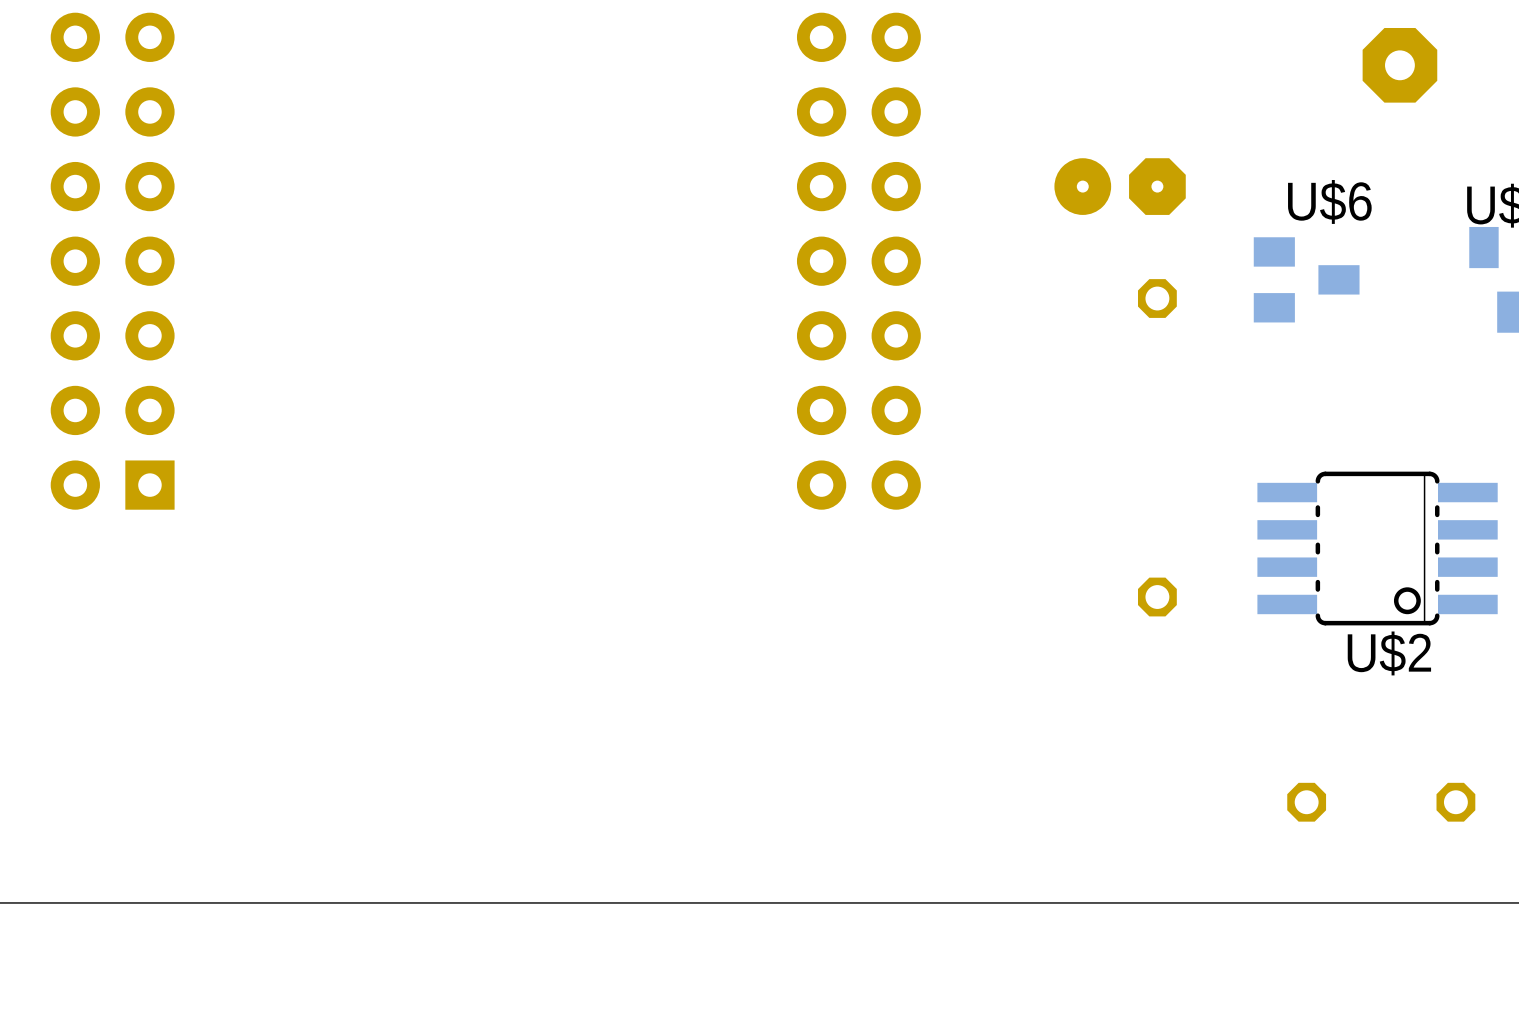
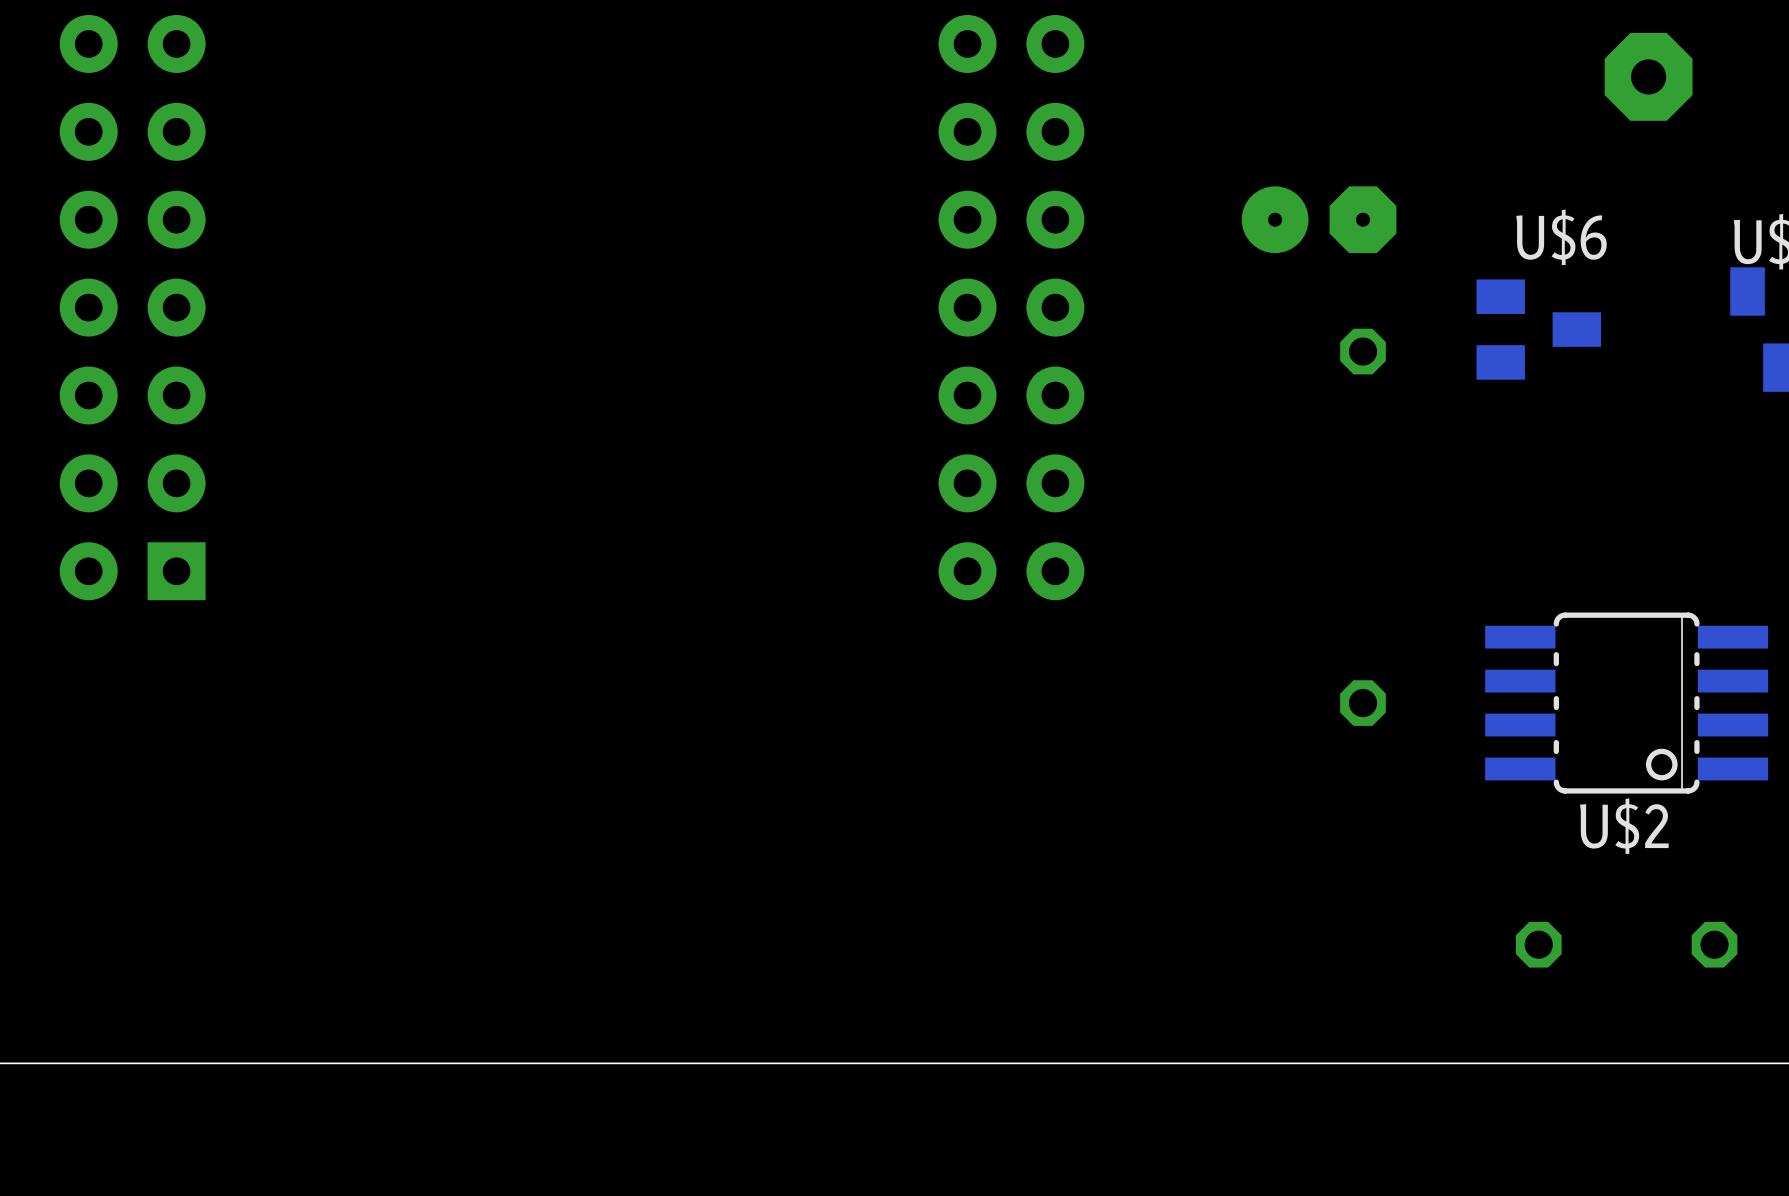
U$2 position: (1377, 548) -> (1626, 703)
U$2 name position: U$2 (1389, 653) -> U$2 (1624, 826)

